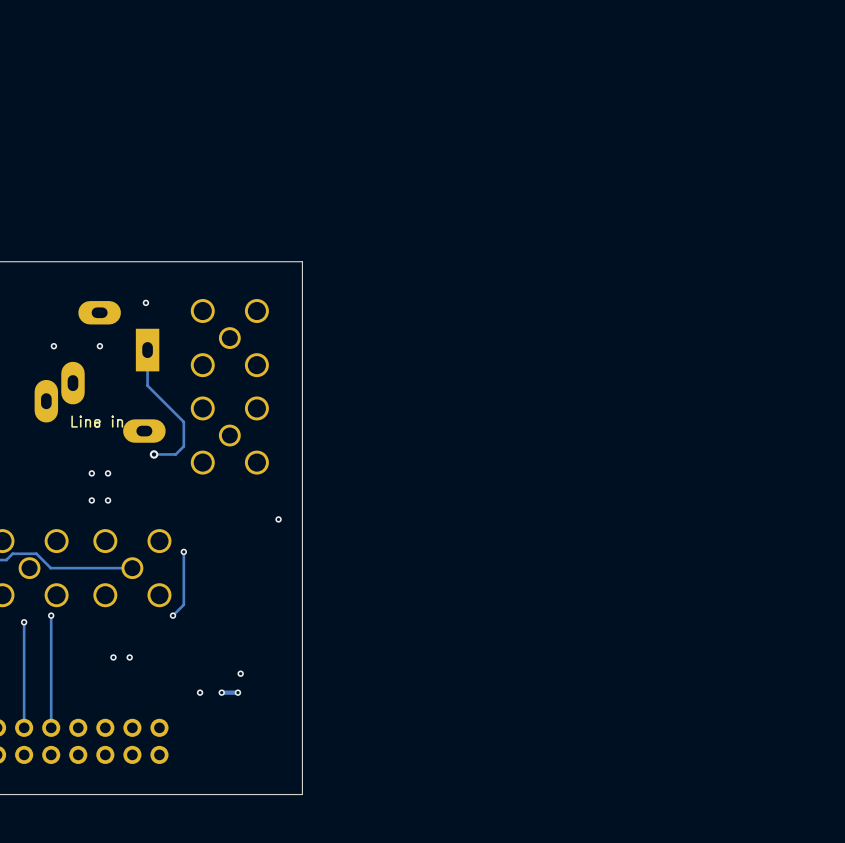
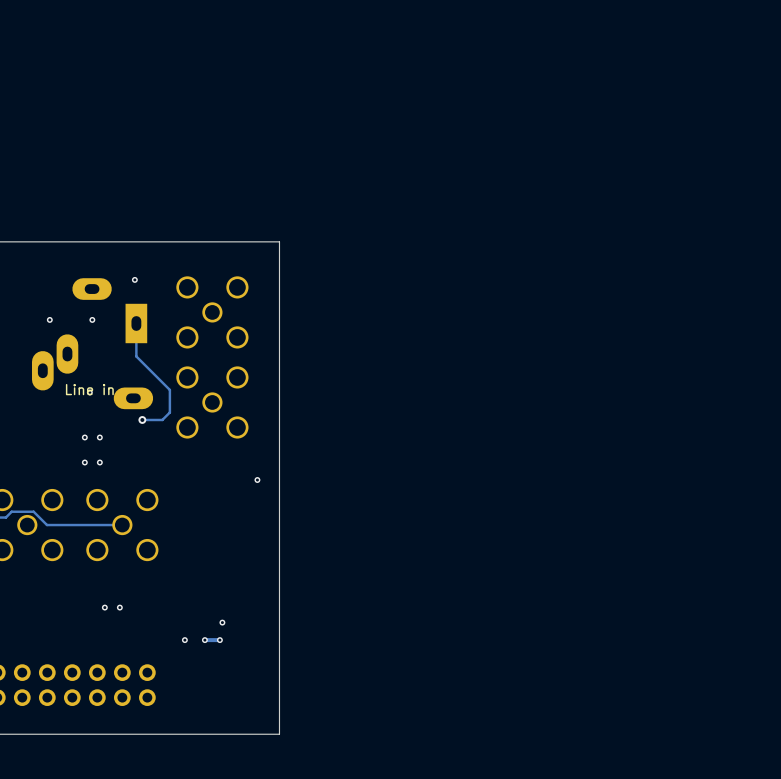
track: (183, 551) (183, 604) (173, 615) -> none
via: (183, 551) -> none
track: (51, 615) (51, 727) -> none
via: (51, 615) -> none
via: (173, 615) -> none
track: (24, 622) (24, 727) -> none
via: (24, 622) -> none

